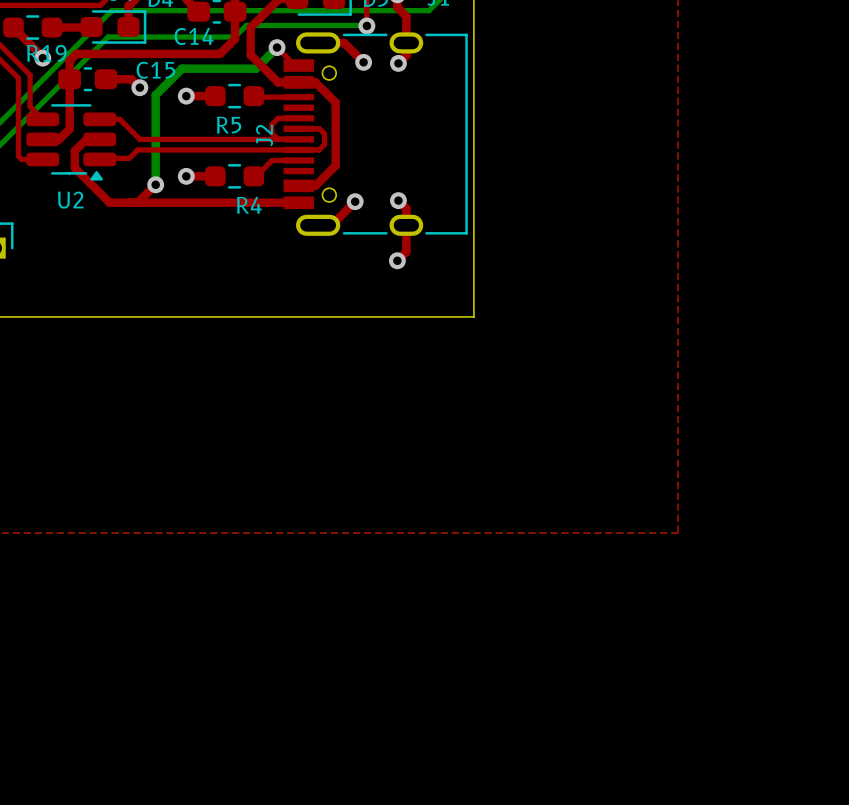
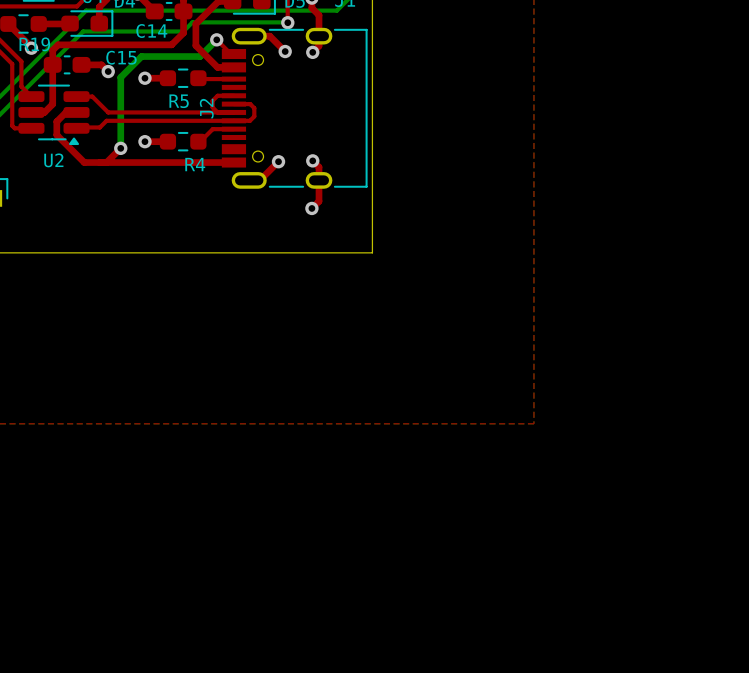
top track: (298, 82) (315, 82) (335, 102) (335, 165) (315, 185) (298, 185) -> none

